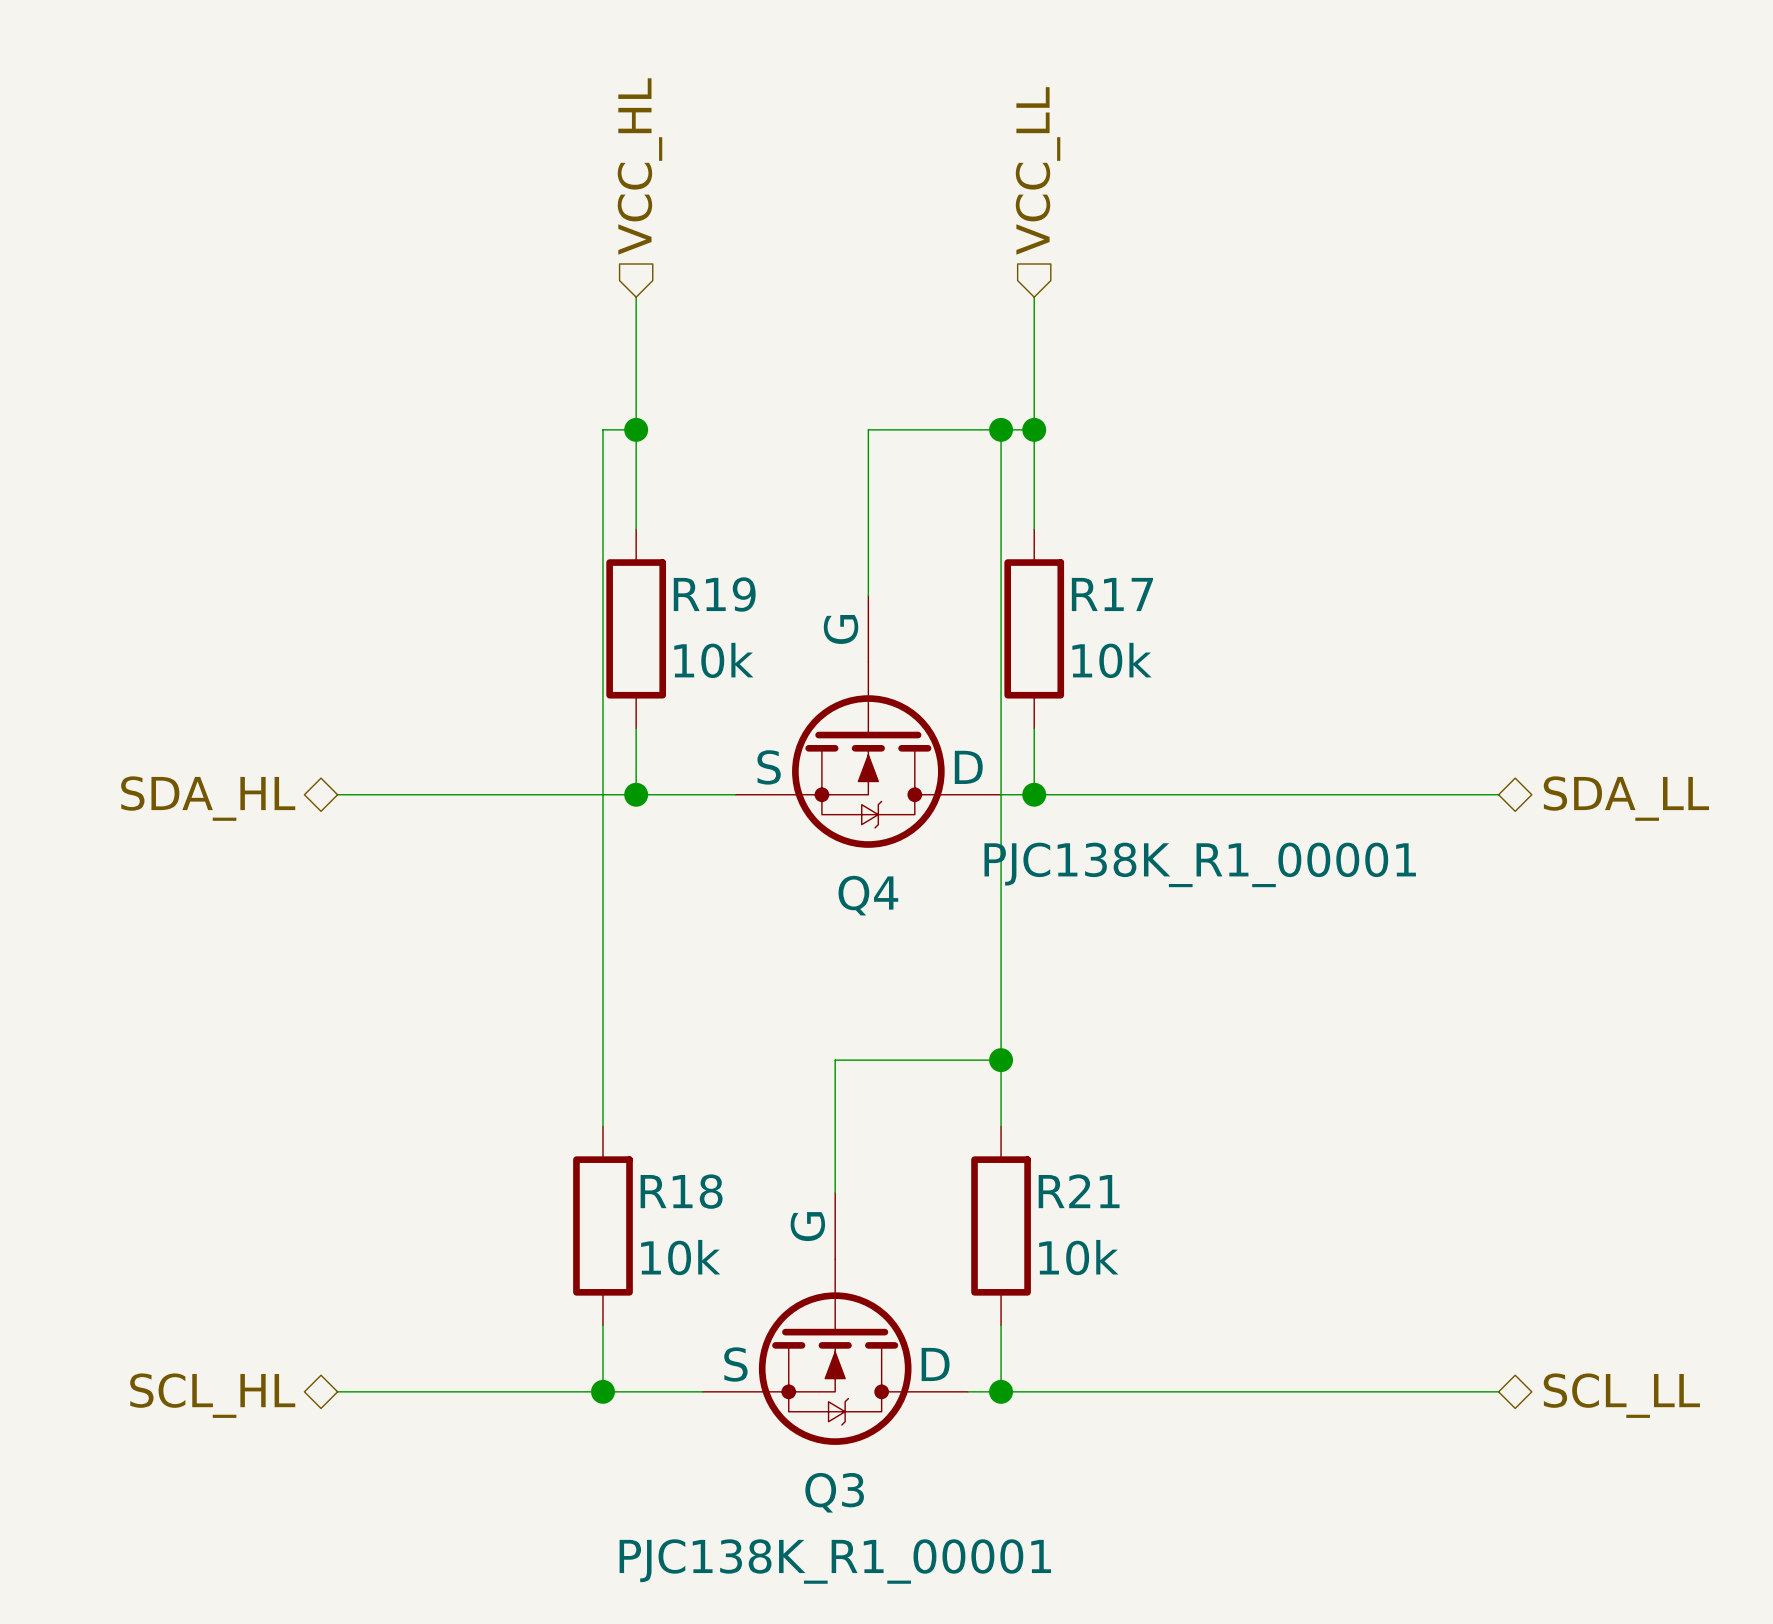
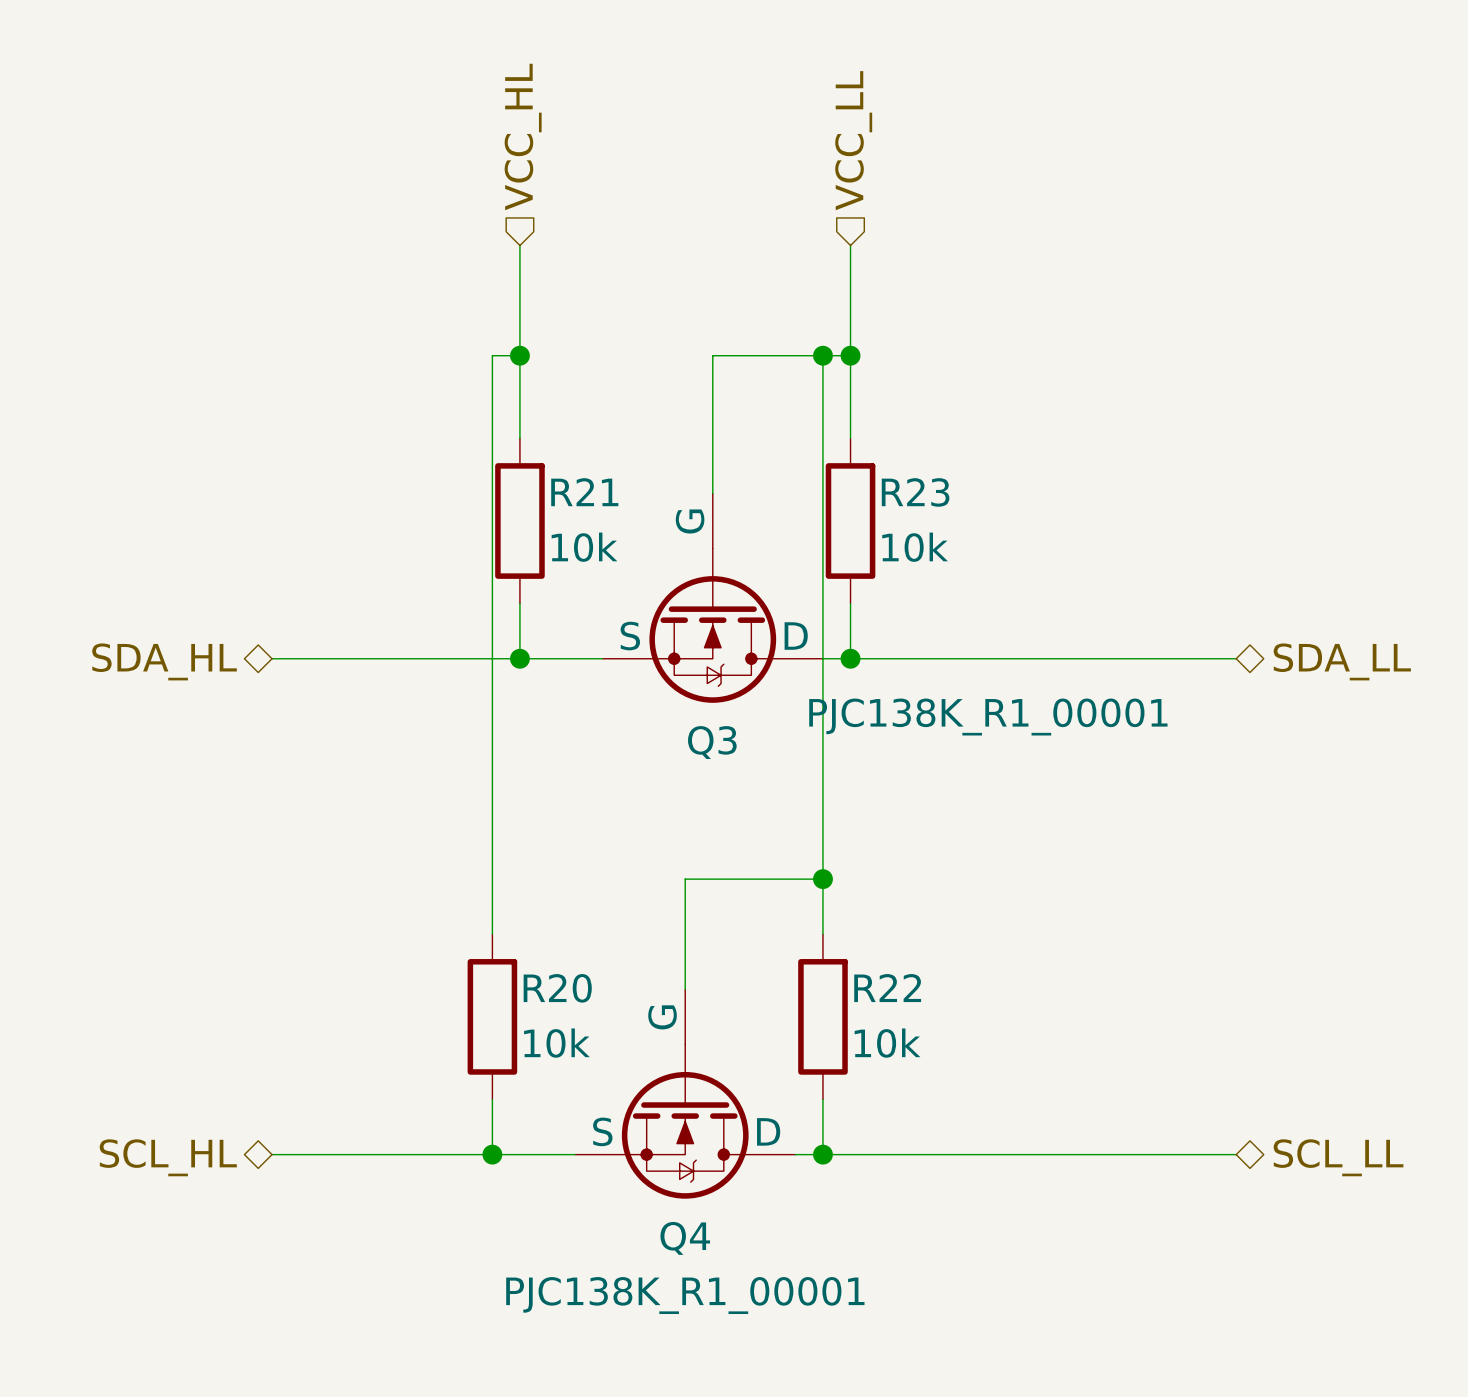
R19 name: R19 (714, 594) -> R21 (584, 492)
R17 name: R17 (1112, 594) -> R23 (915, 492)
Q4 name: Q4 (868, 895) -> Q3 (712, 742)
R18 name: R18 (681, 1191) -> R20 (557, 988)
R21 name: R21 (1079, 1191) -> R22 (887, 988)
Q3 name: Q3 (834, 1492) -> Q4 (685, 1238)

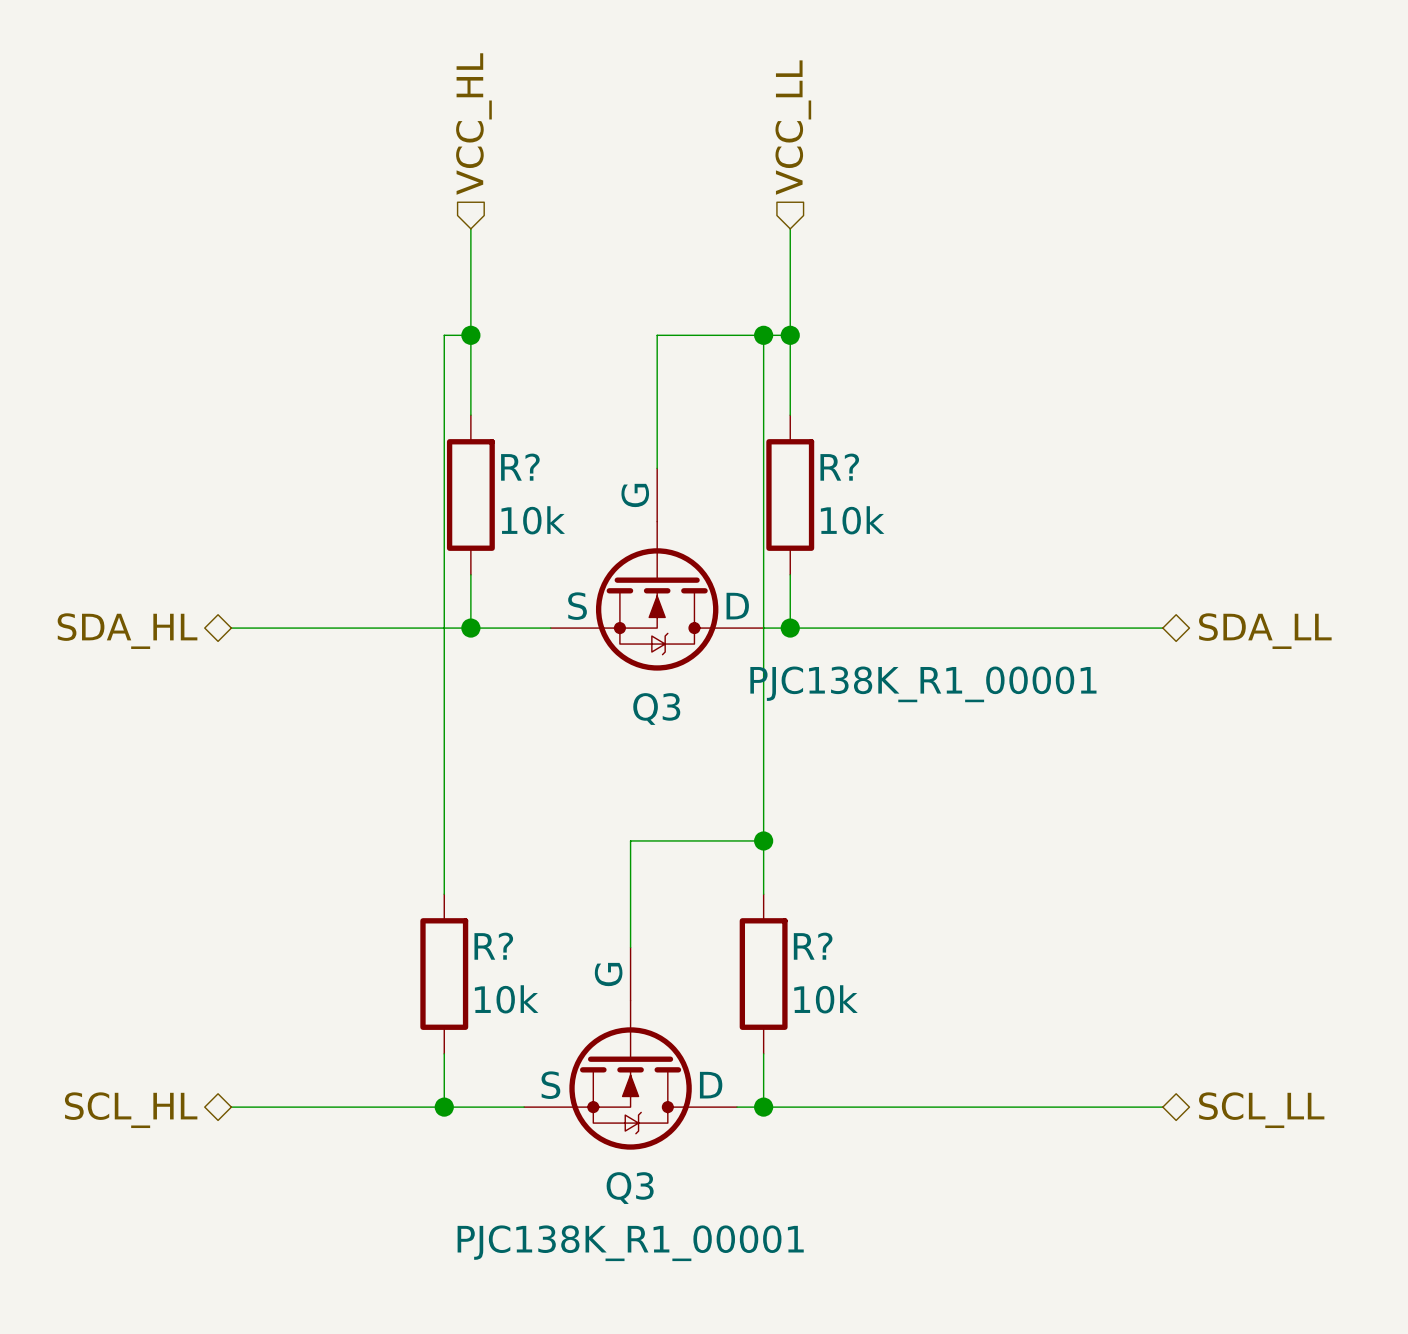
R21 name: R21 (584, 492) -> R? (520, 467)
R23 name: R23 (915, 492) -> R? (839, 467)
R20 name: R20 (557, 988) -> R? (493, 946)
R22 name: R22 (887, 988) -> R? (813, 946)
Q4 name: Q4 (685, 1238) -> Q3 (630, 1188)

